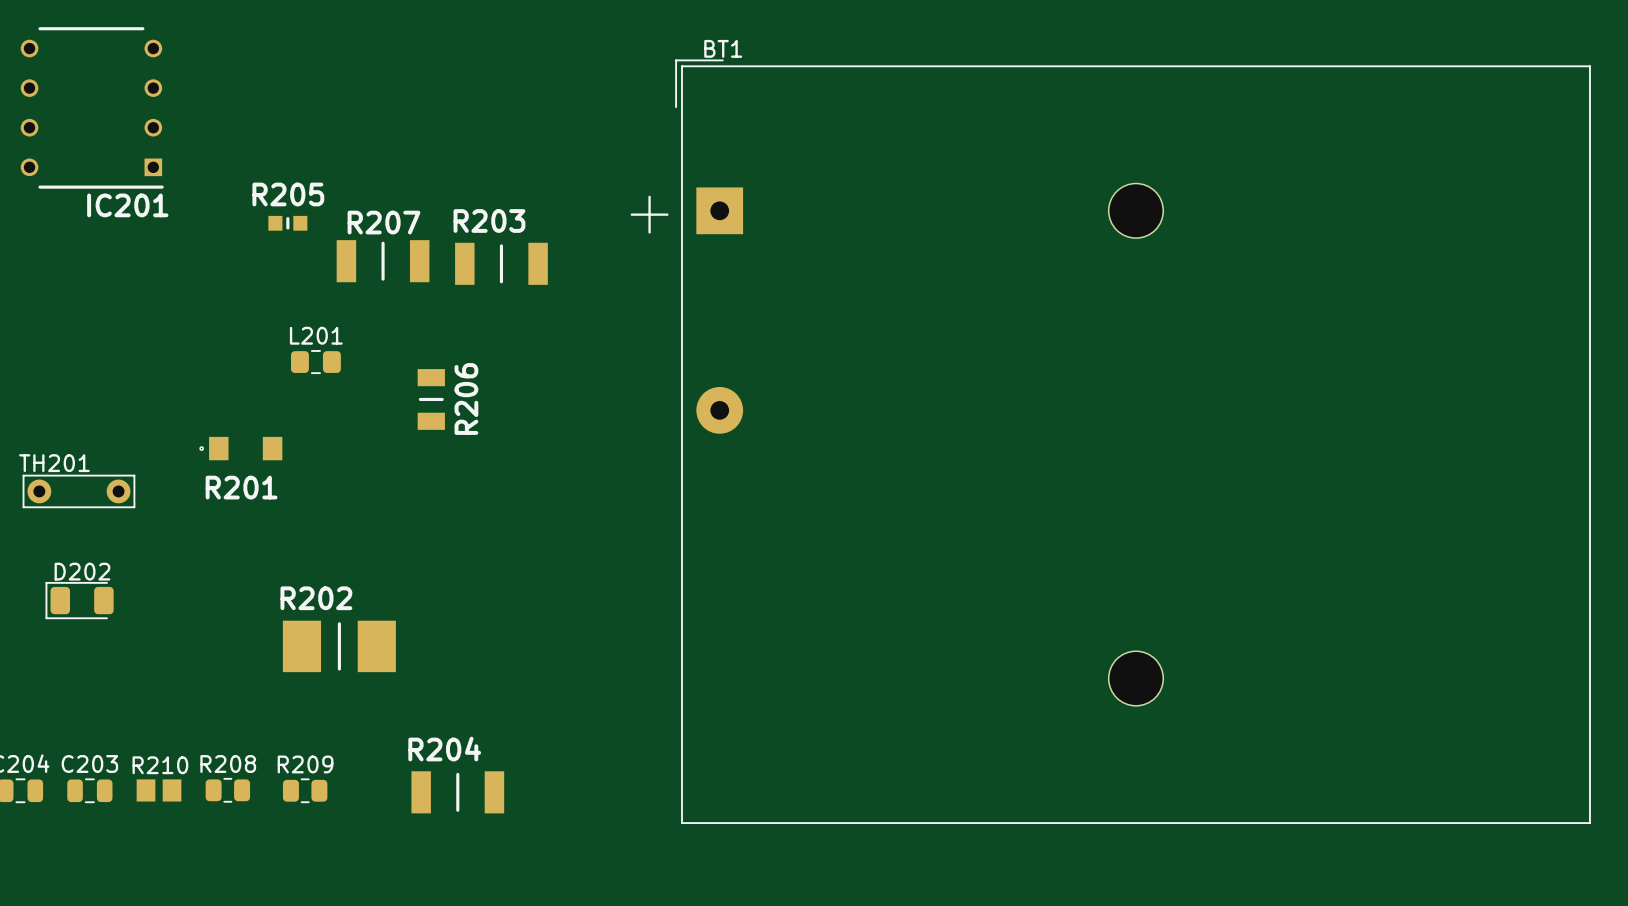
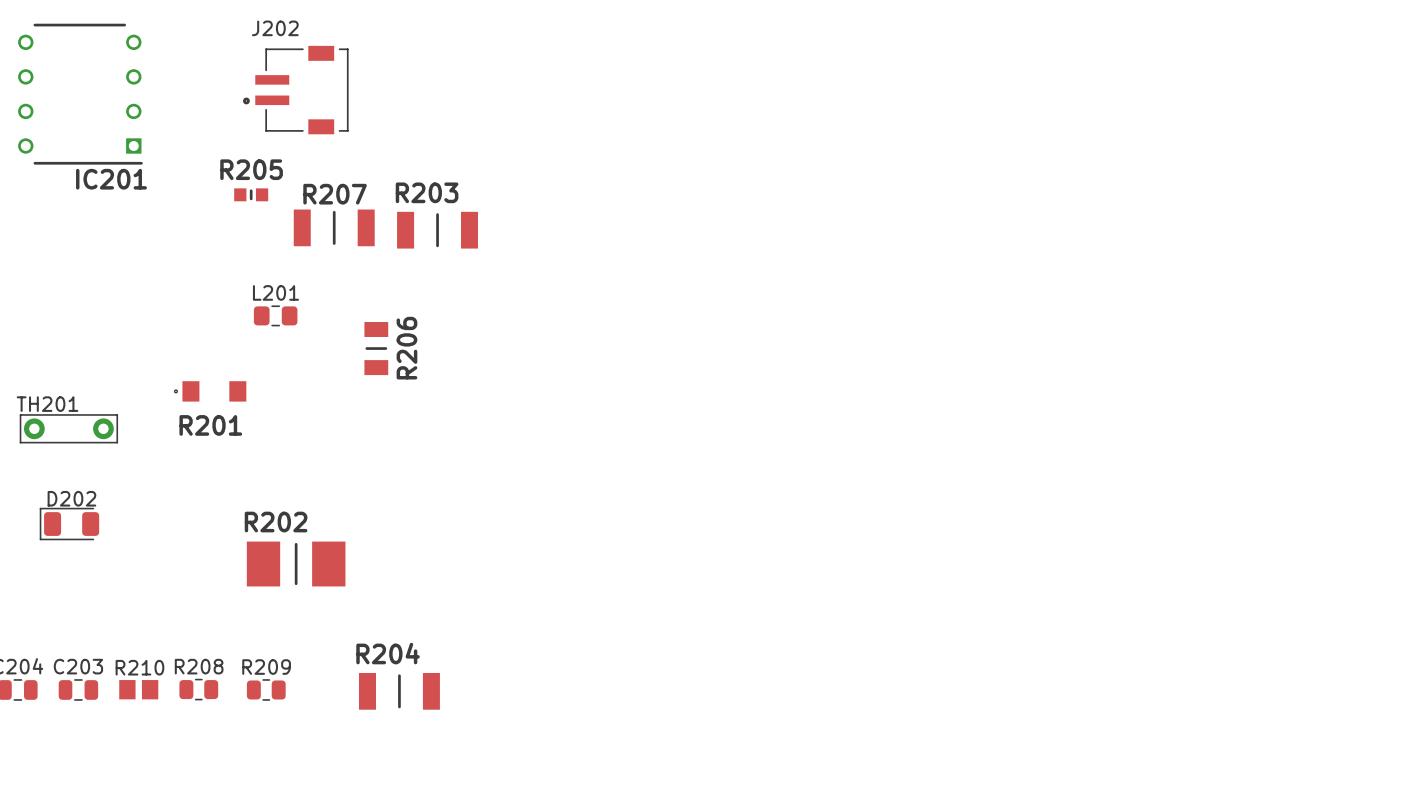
J202: none -> (295, 90)
BT1: (1133, 441) -> none

